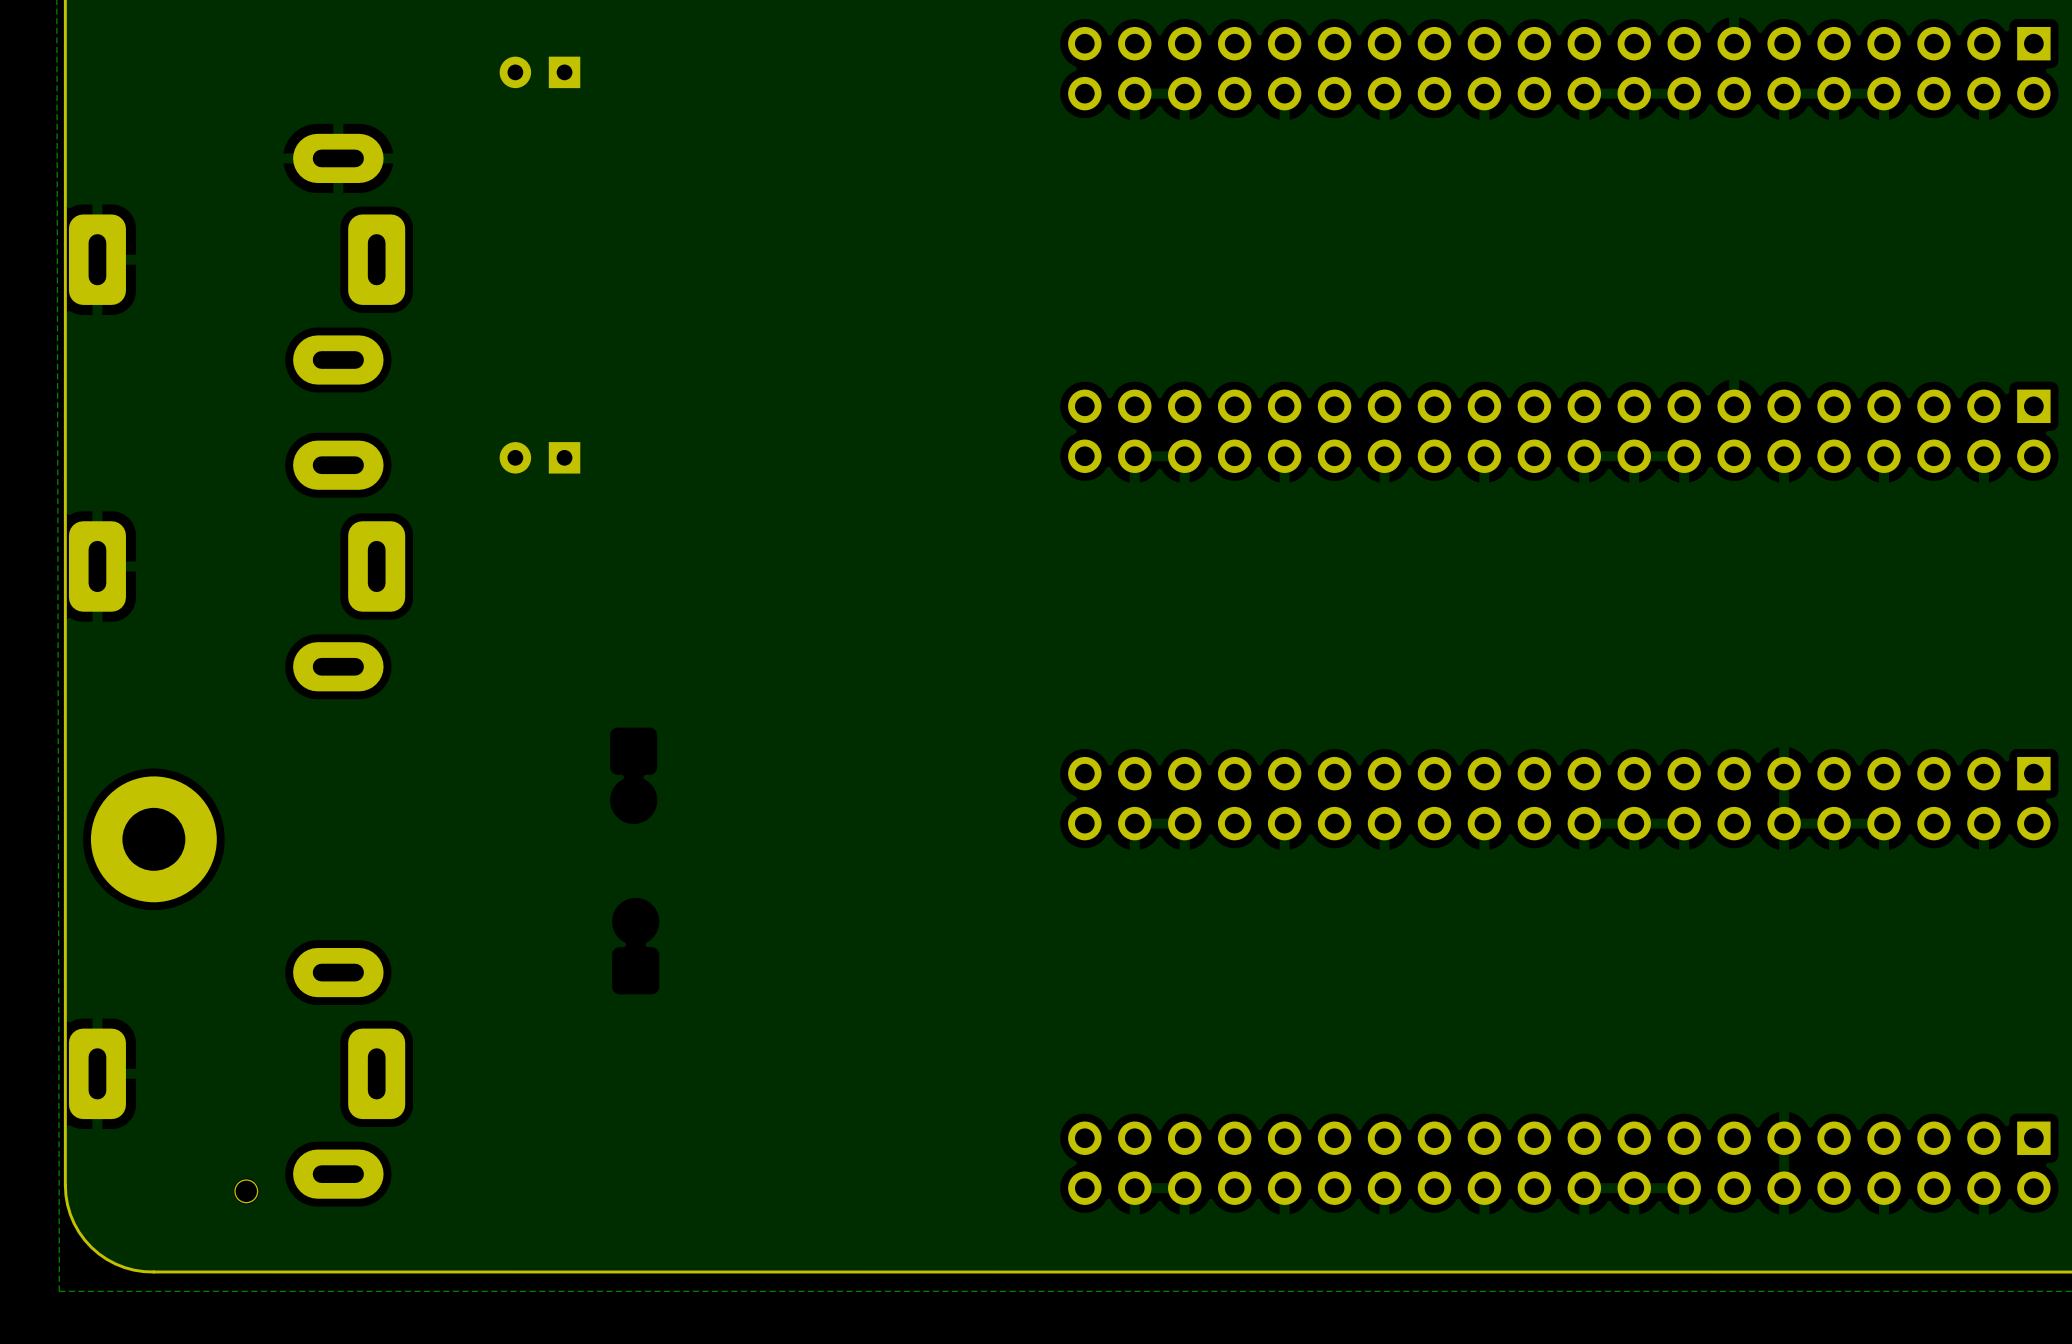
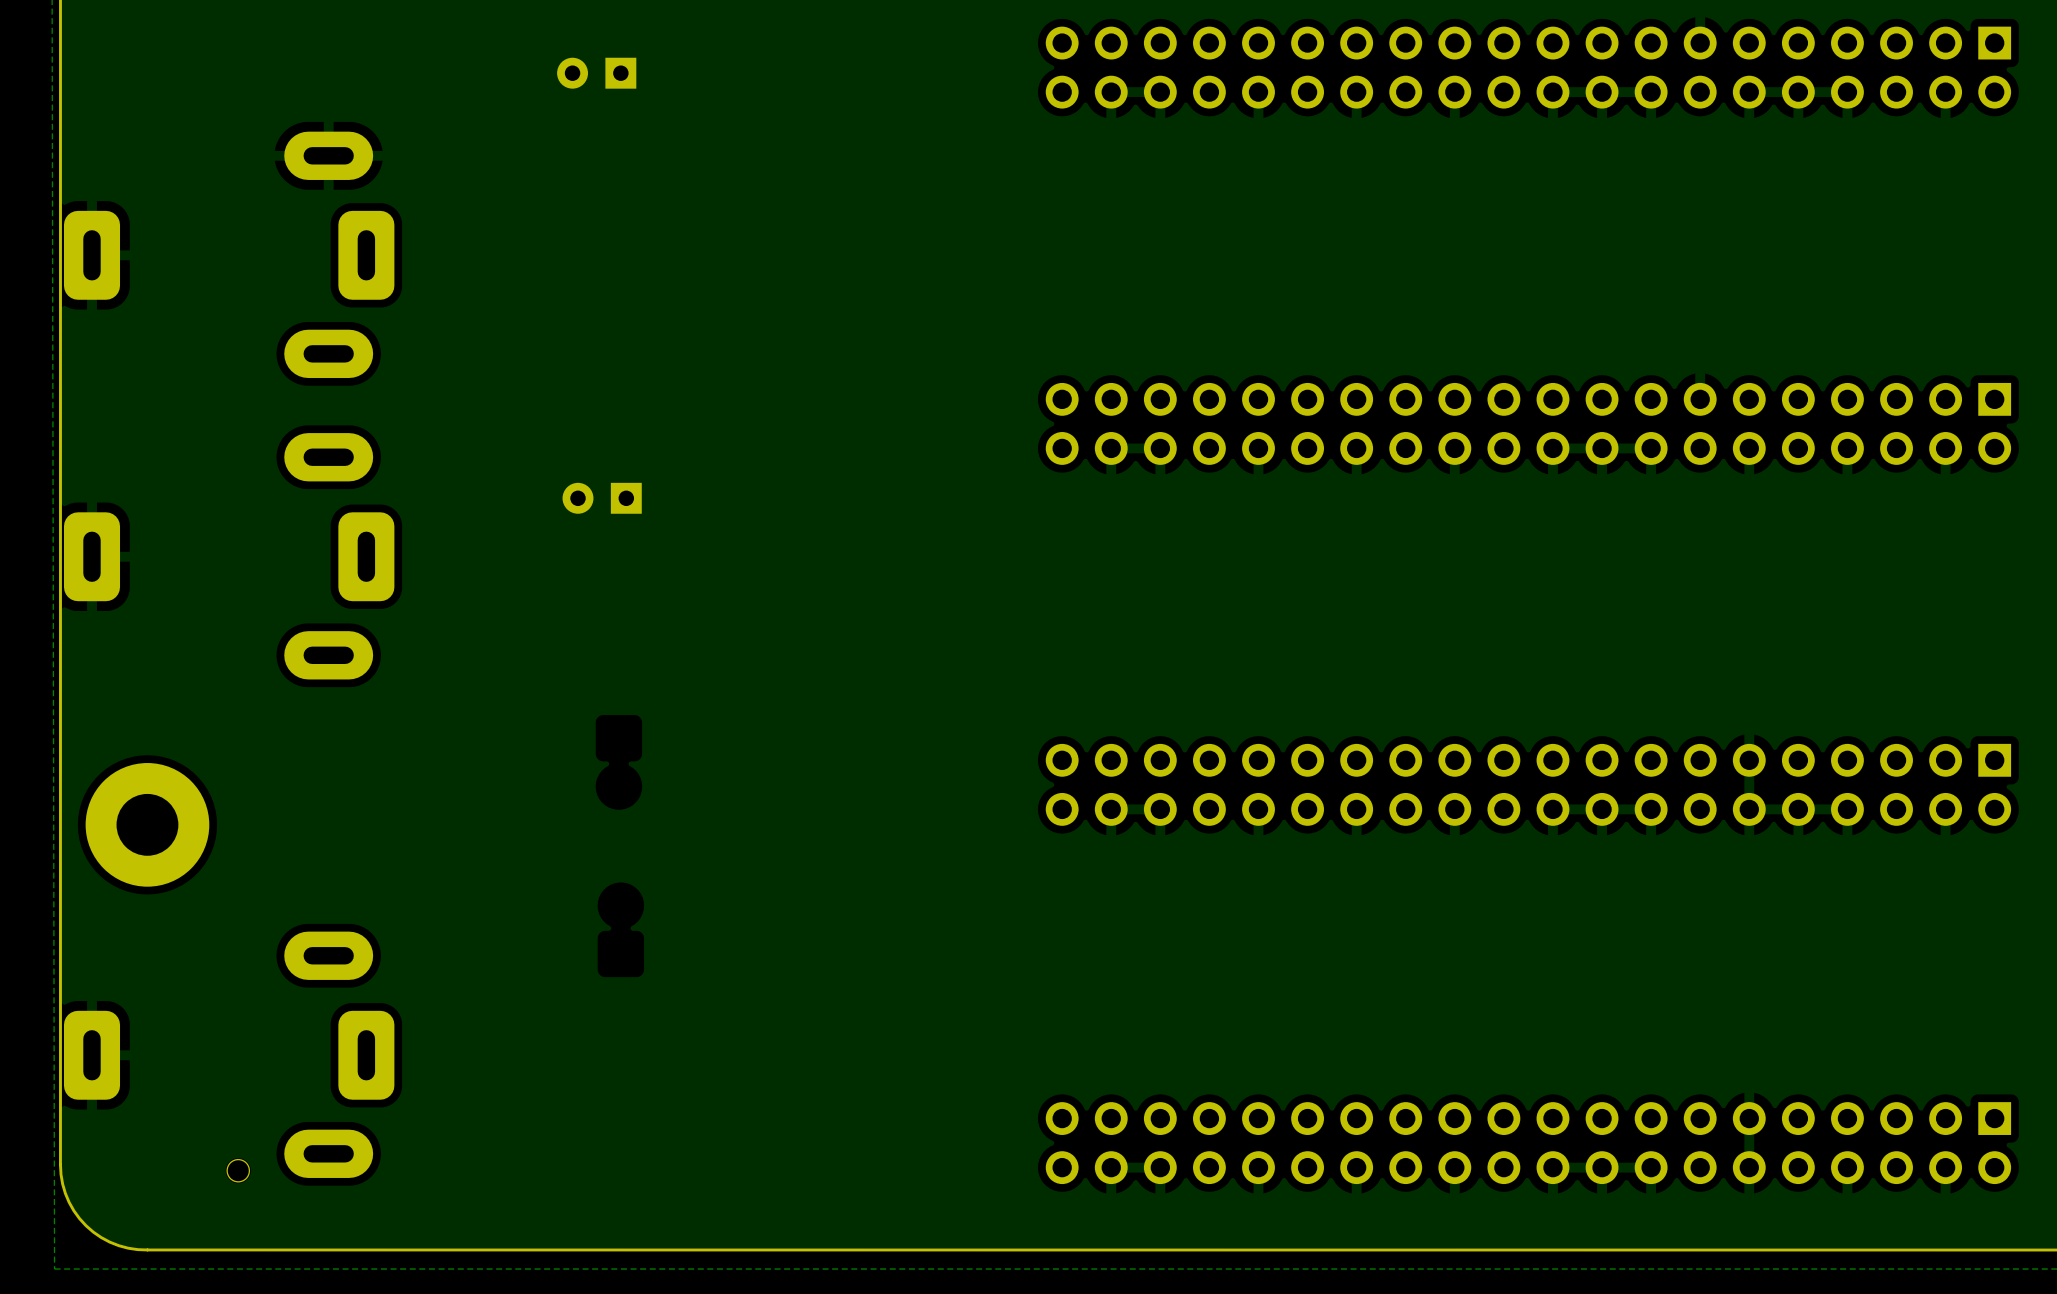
part position: (539, 72) -> (596, 73)
part position: (539, 457) -> (602, 498)

